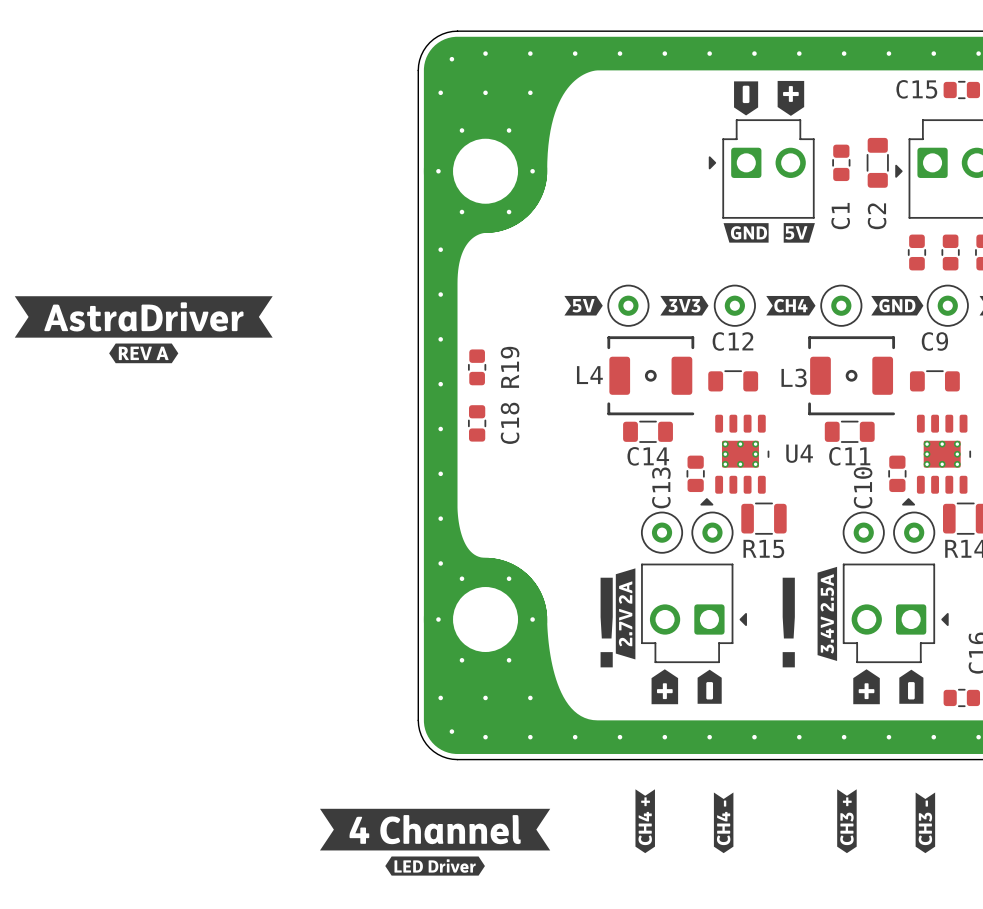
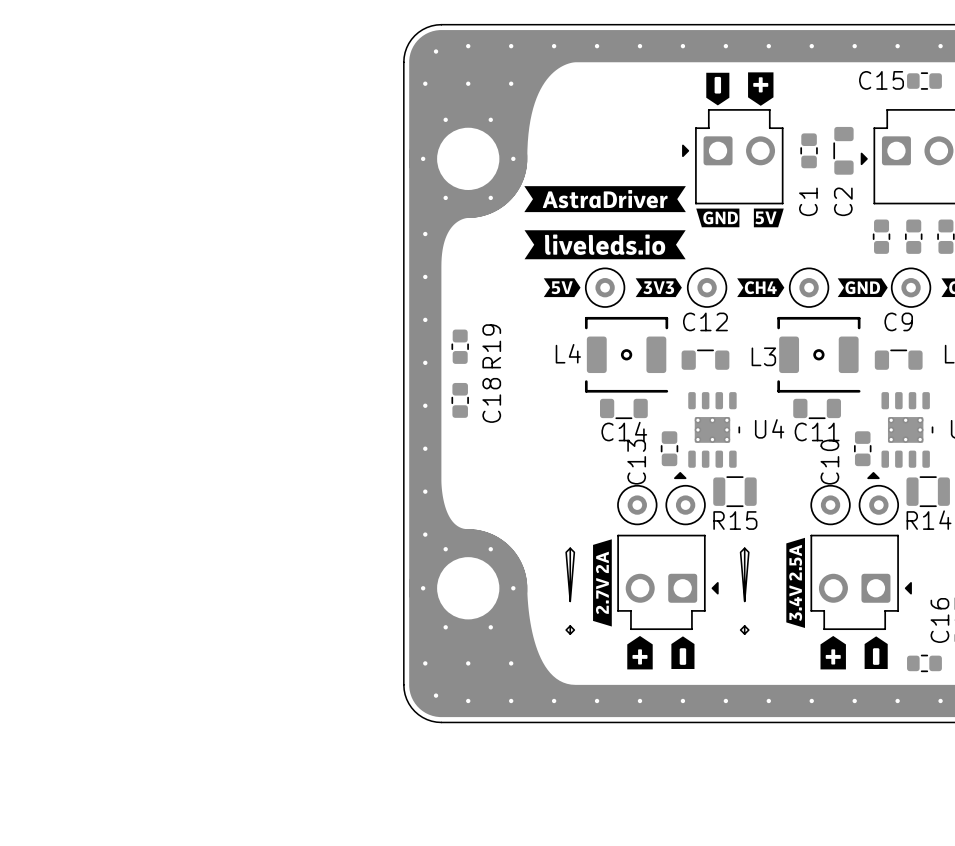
C2 footprint: [866, 137, 889, 188] -> [833, 126, 854, 175]
drawing: none -> [524, 186, 686, 213]
drawing: none -> [524, 230, 686, 260]
drawing: [14, 296, 273, 364] -> none
C14 footprint: [623, 420, 673, 443] -> [600, 398, 648, 420]
C11 footprint: [824, 420, 875, 443] -> [793, 398, 842, 420]
drawing: [635, 789, 655, 854] -> none
drawing: [837, 789, 857, 854] -> none
drawing: [713, 792, 734, 854] -> none
drawing: [915, 792, 936, 854] -> none
drawing: [320, 808, 551, 876] -> none

